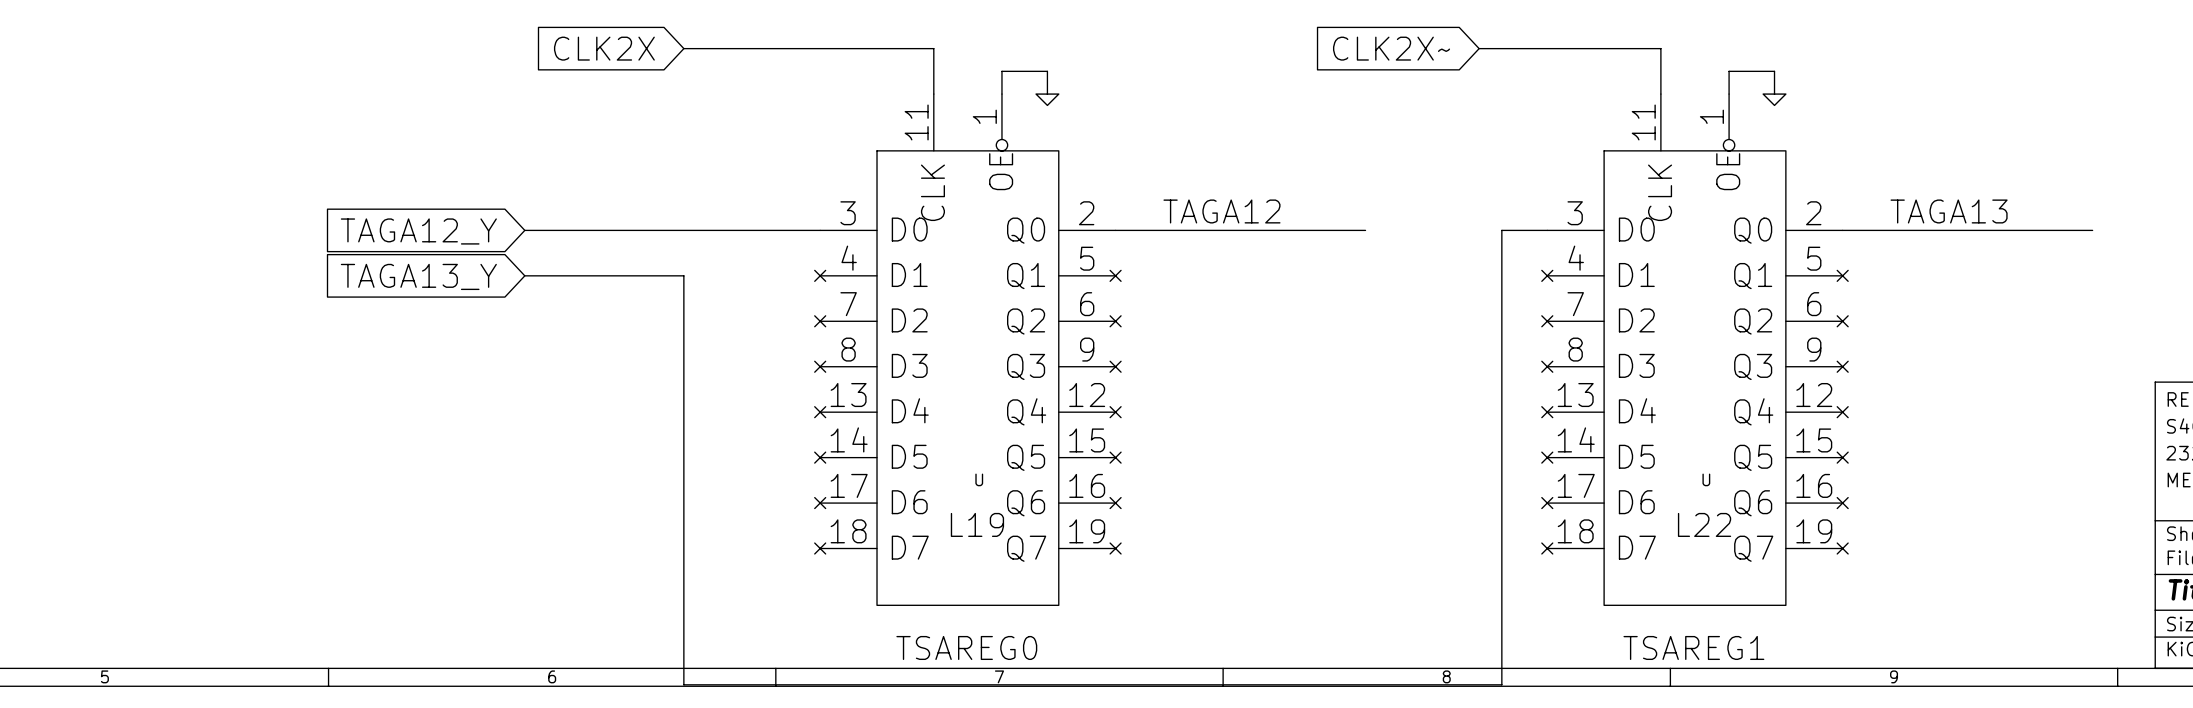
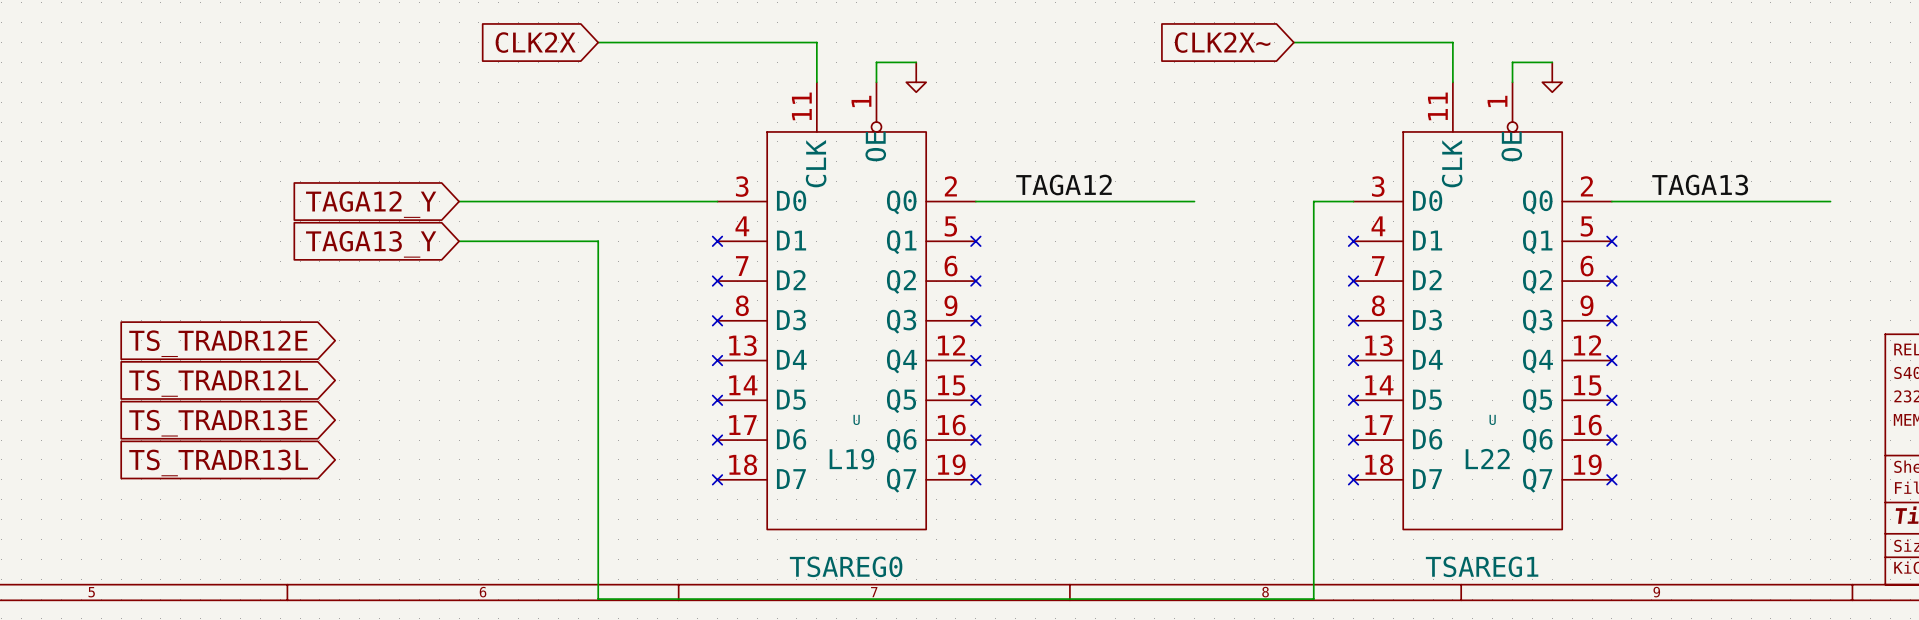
global label: none -> TS_TRADR12E (218, 343)
global label: none -> TS_TRADR12L (218, 383)
global label: none -> TS_TRADR13E (218, 423)
global label: none -> TS_TRADR13L (218, 462)

